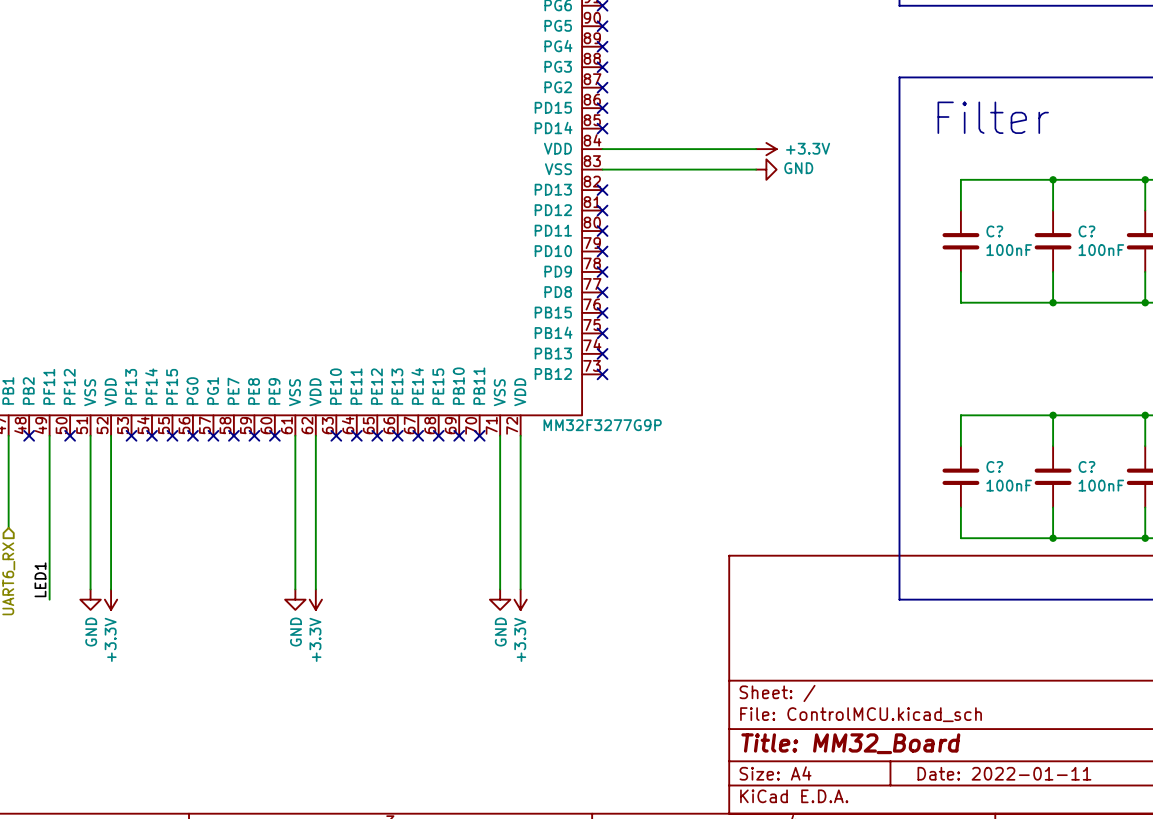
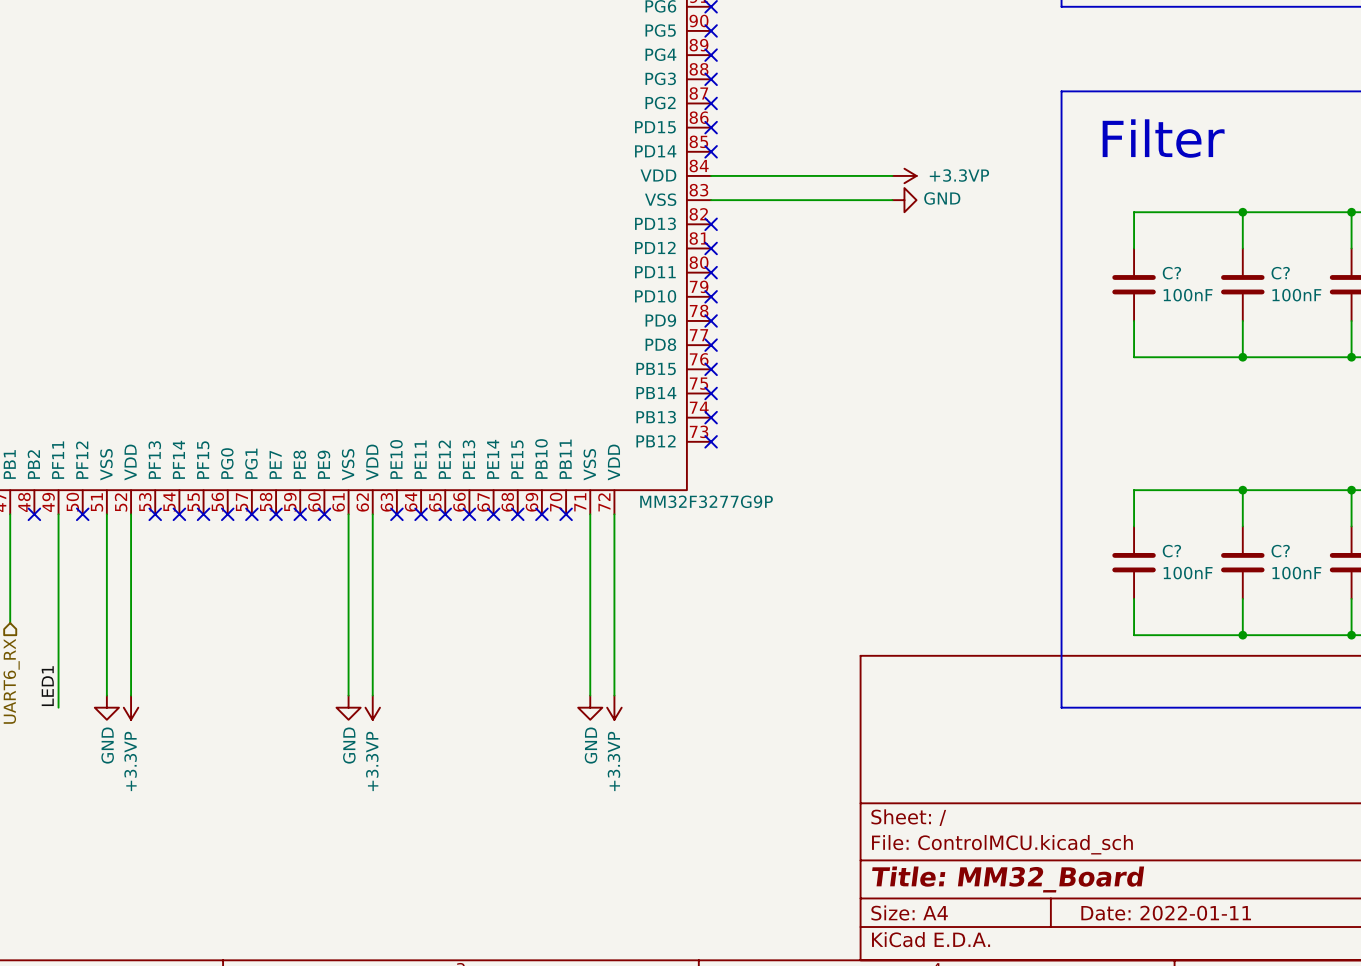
power symbol: +3.3V (766, 149) -> +3.3VP (904, 175)
power symbol: +3.3V (111, 599) -> +3.3VP (131, 707)
power symbol: +3.3V (315, 599) -> +3.3VP (372, 707)
power symbol: +3.3V (520, 599) -> +3.3VP (614, 707)

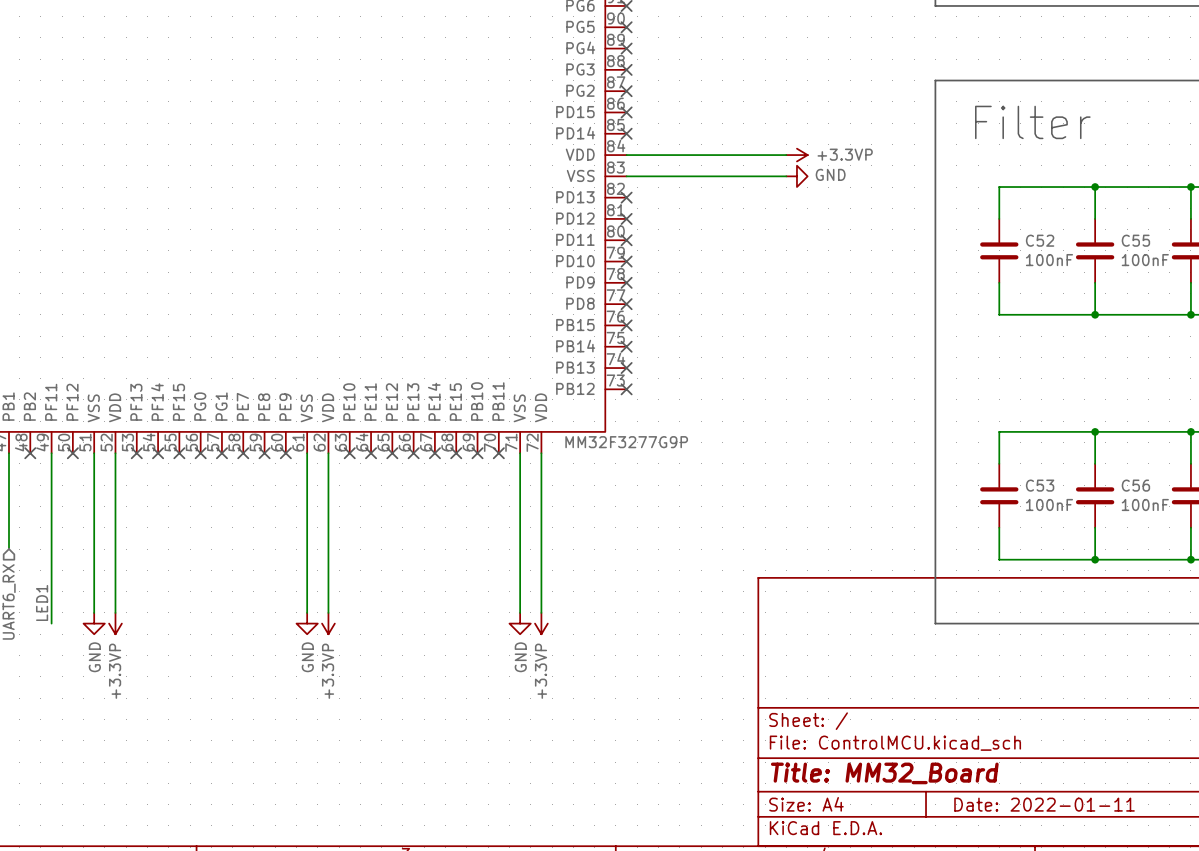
C? name: C? (1171, 273) -> C52 (1040, 240)
C? name: C? (1280, 273) -> C55 (1135, 240)
C? name: C? (1171, 551) -> C53 (1040, 485)
C? name: C? (1280, 551) -> C56 (1135, 485)

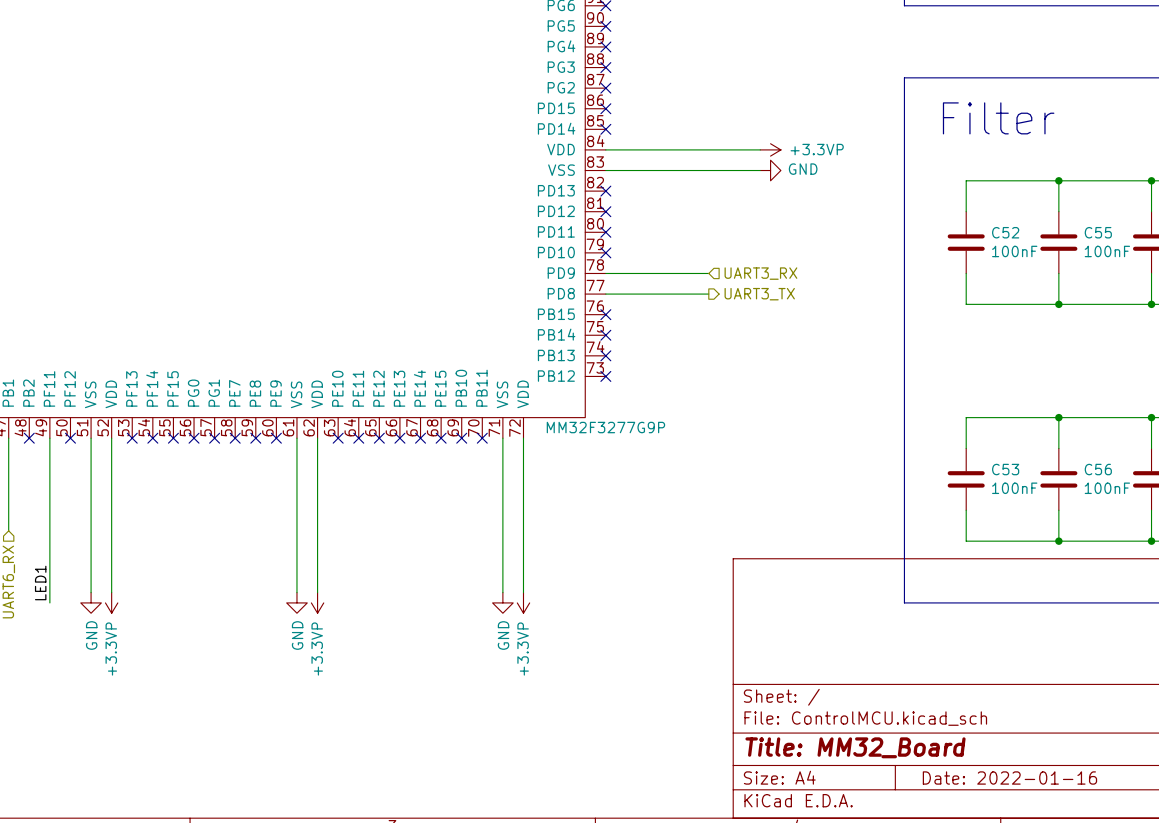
wire: none -> (605, 273) (708, 273)
no-connect mark: (626, 282) -> none
hierarchical label: none -> UART3_RX (760, 273)
wire: none -> (605, 294) (708, 294)
no-connect mark: (626, 304) -> none
hierarchical label: none -> UART3_TX (759, 294)
title block: Date: 2022-01-11 (1044, 804) -> Date: 2022-01-16 (1009, 778)

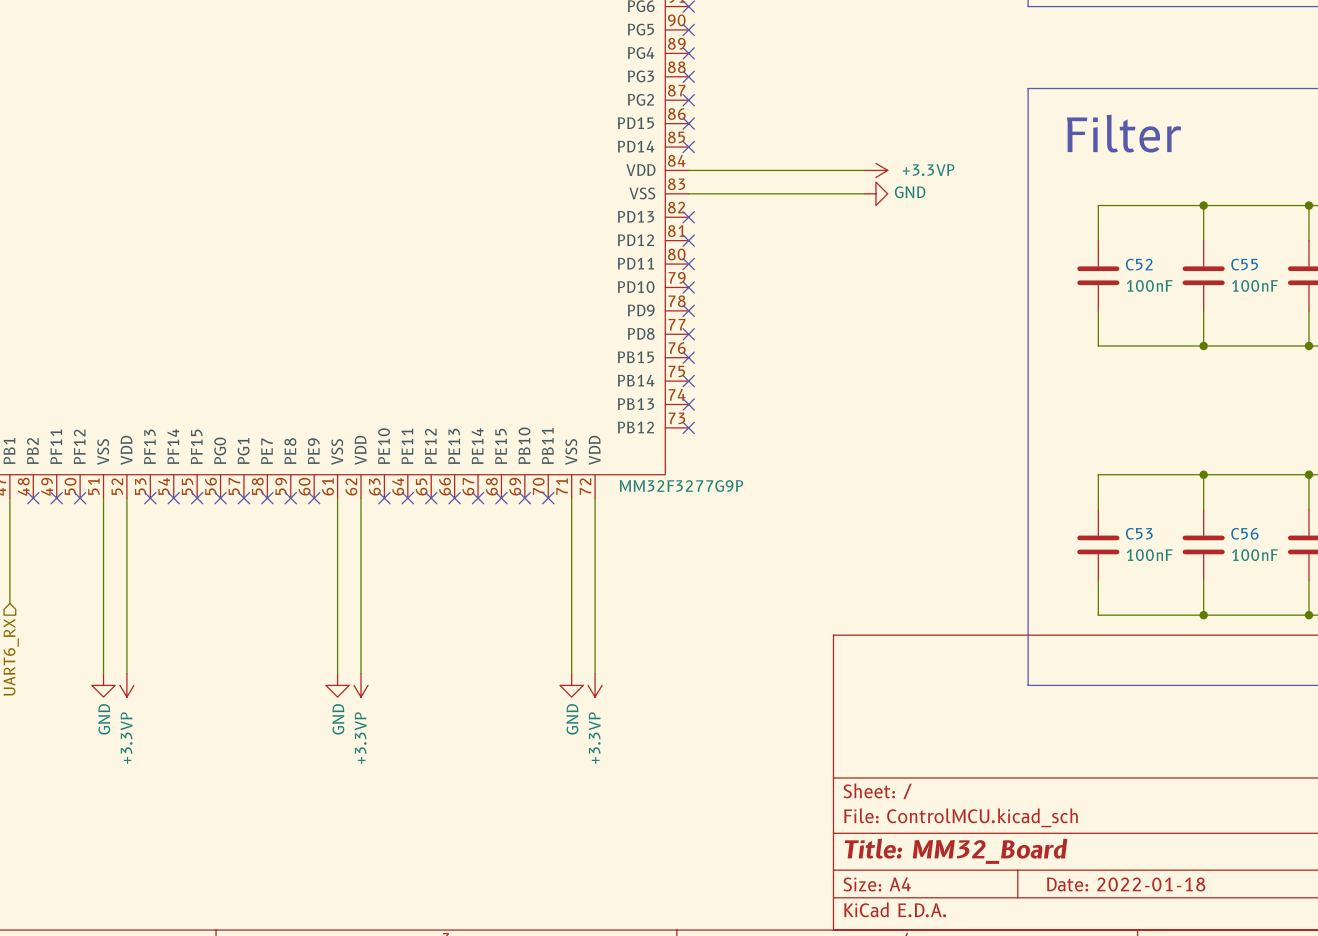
wire: (605, 273) (708, 273) -> none
no-connect mark: none -> (688, 310)
hierarchical label: UART3_RX (760, 273) -> none
wire: (605, 294) (708, 294) -> none
no-connect mark: none -> (688, 334)
hierarchical label: UART3_TX (759, 294) -> none
wire: (49, 438) (49, 602) -> none
no-connect mark: none -> (56, 498)
label: LED1 (40, 583) -> none
title block: Date: 2022-01-16 (1009, 778) -> Date: 2022-01-18 (1126, 884)

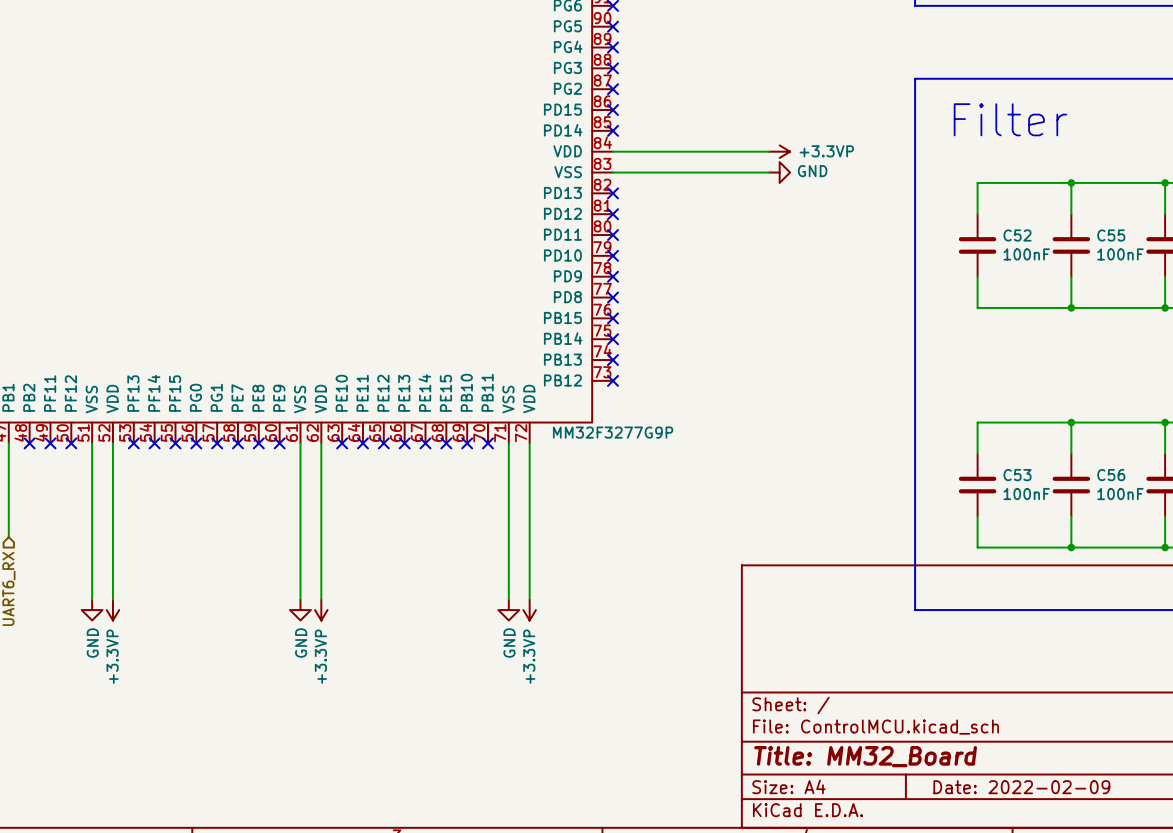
title block: Date: 2022-01-18 (1126, 884) -> Date: 2022-02-09 (1021, 787)

